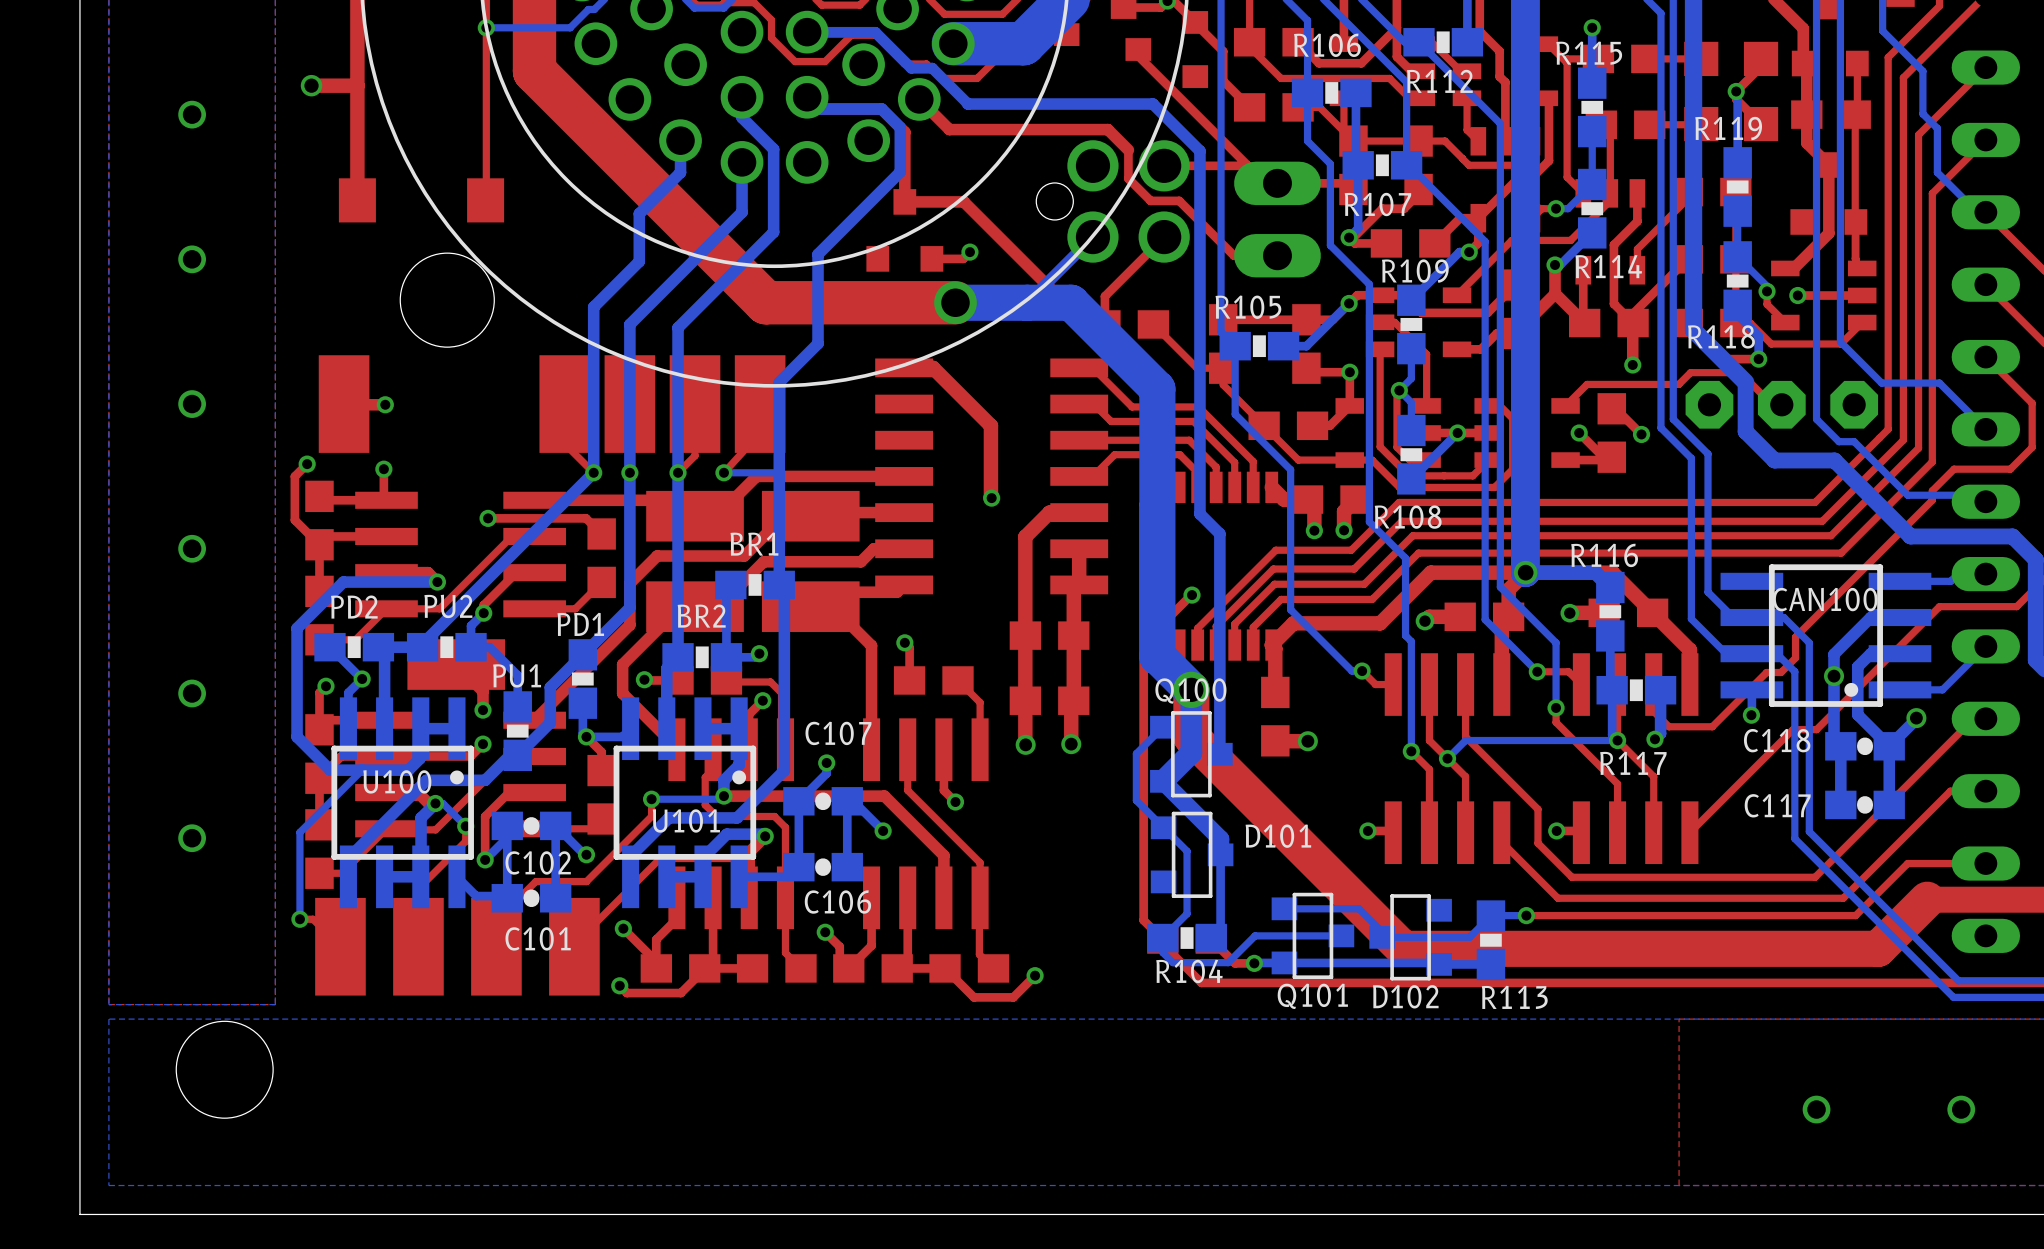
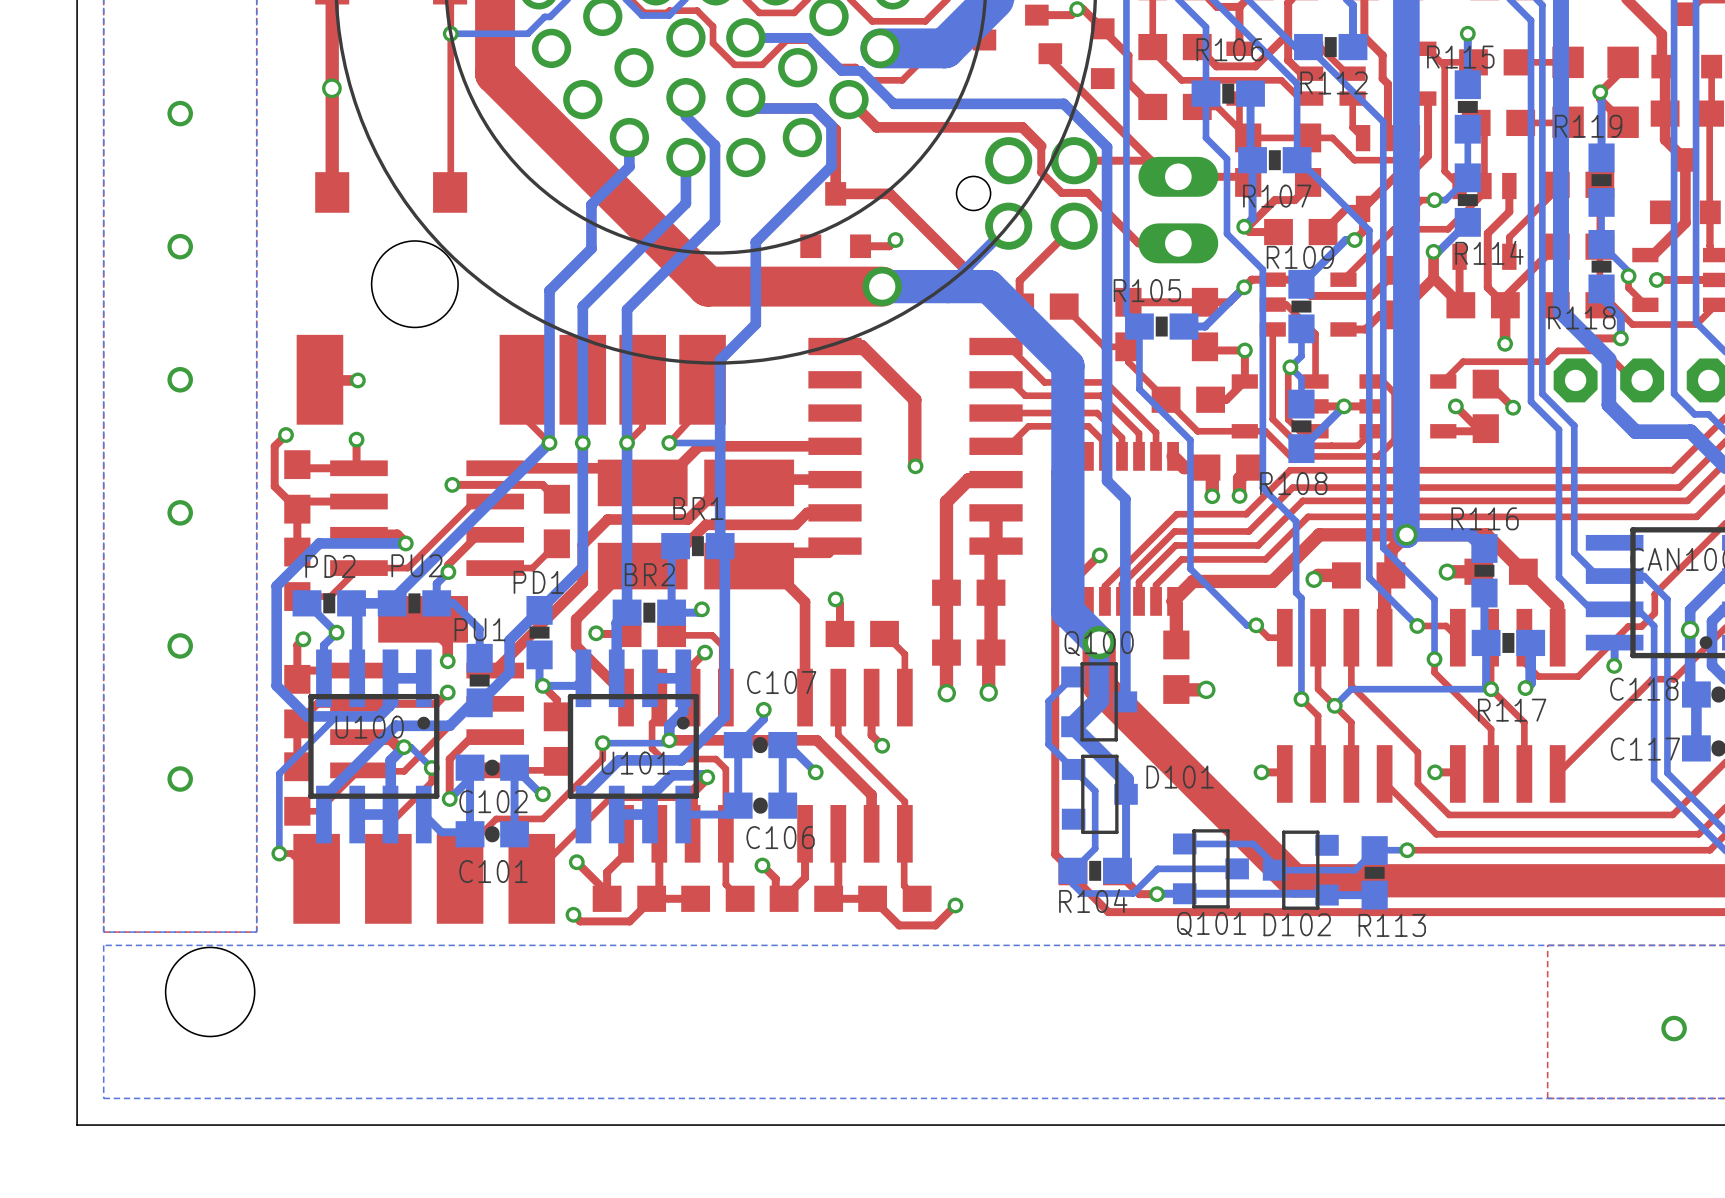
via position: (311, 85) -> (331, 88)
top track: (357, 85) (311, 85) -> none

